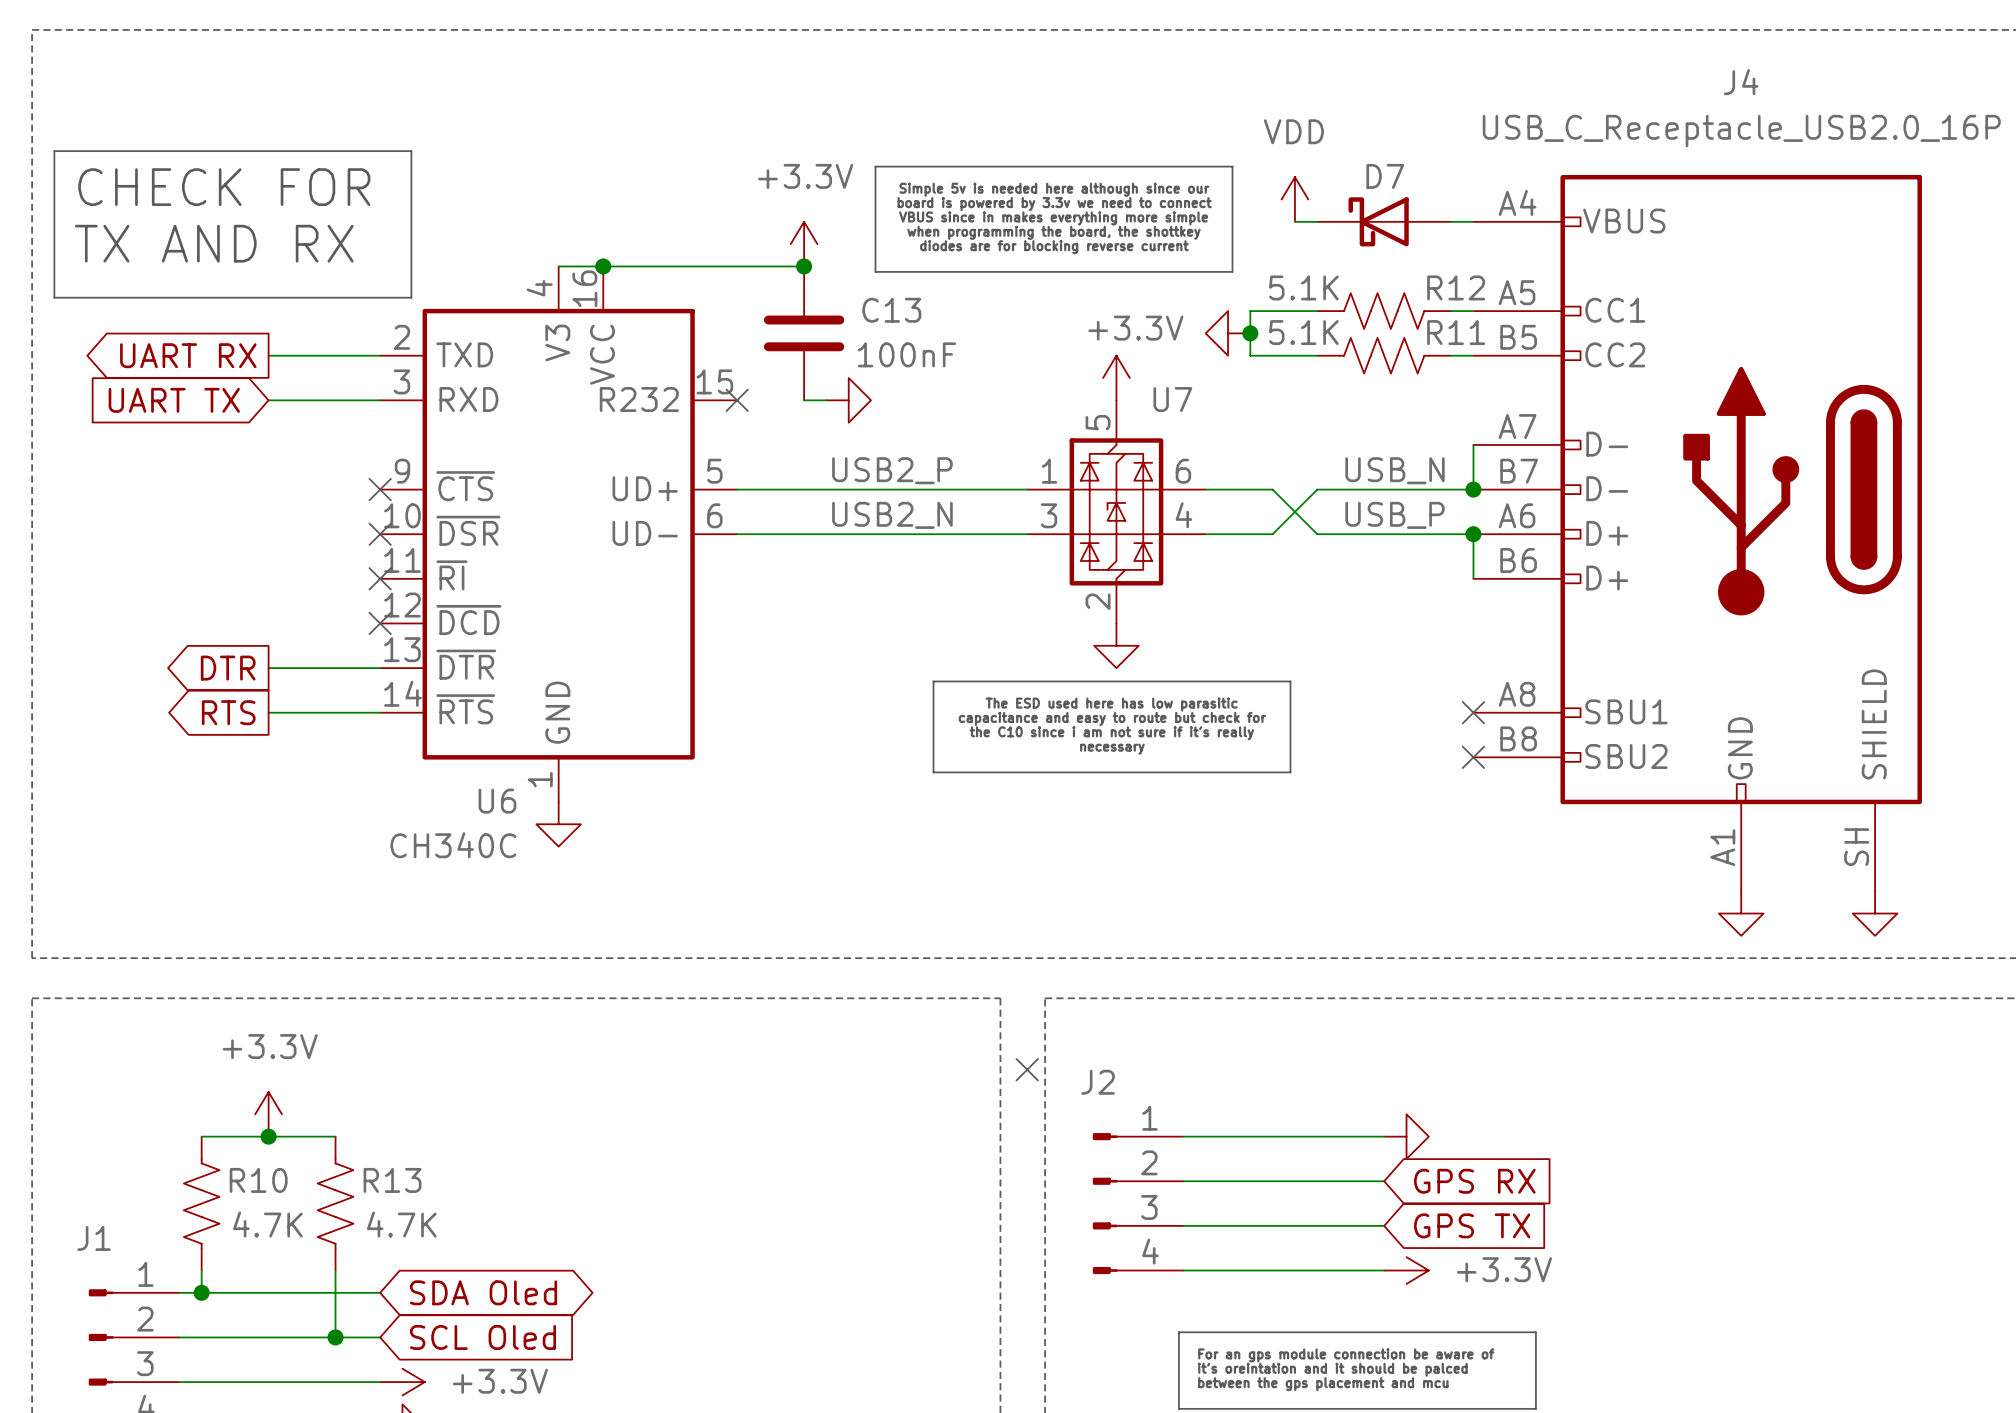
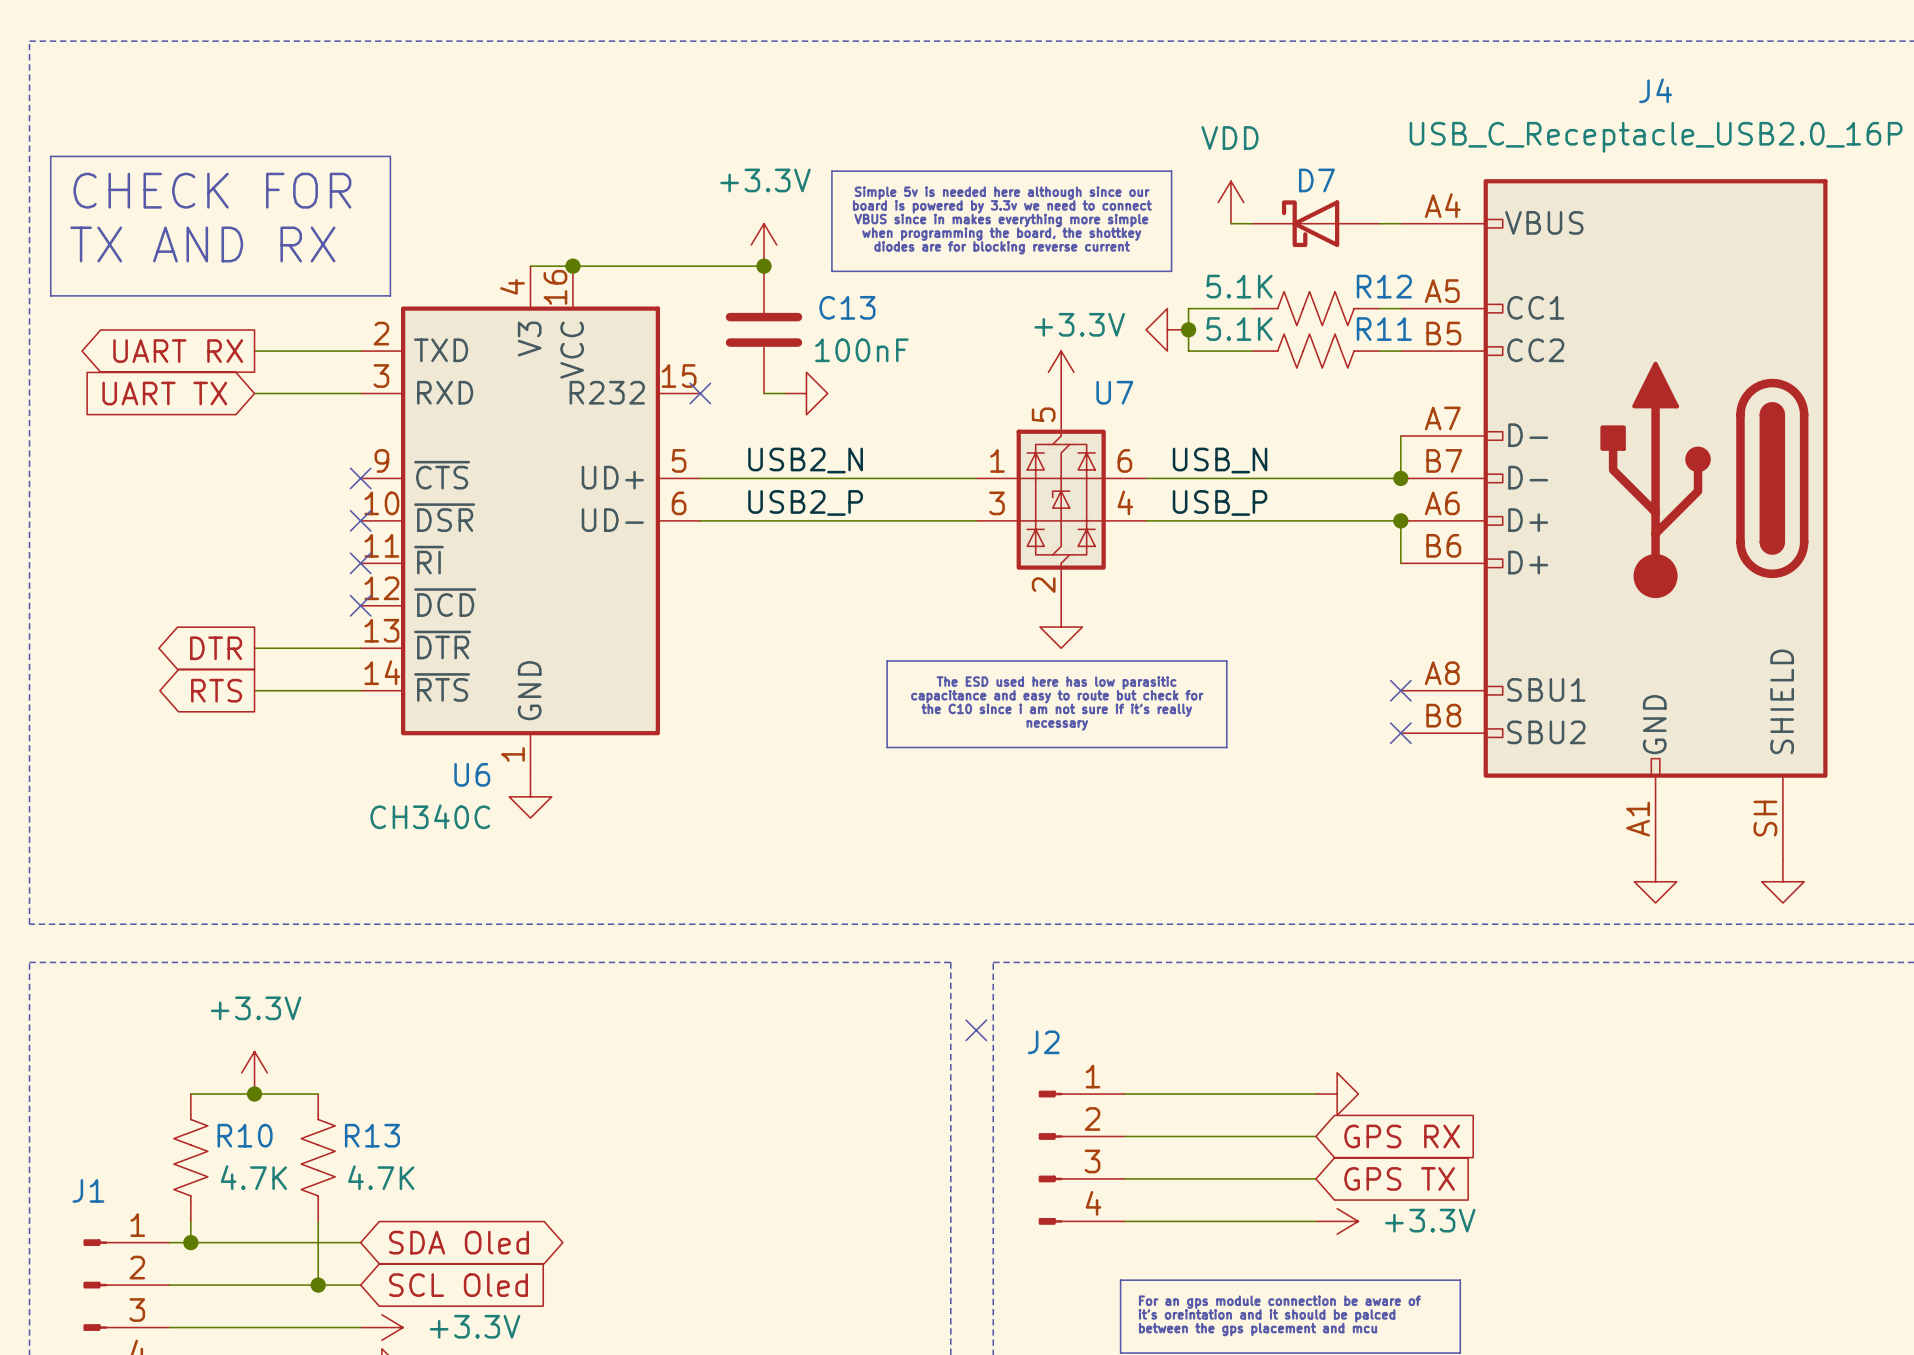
label position: USB2_P (892, 470) -> USB2_P (805, 502)
label position: USB_N (1395, 470) -> USB_N (1220, 460)
wire: (1272, 489) (1317, 534) -> (1209, 478) (1252, 478)
wire: (1317, 489) (1272, 534) -> (1252, 520) (1209, 520)
label position: USB2_N (892, 515) -> USB2_N (805, 460)
label position: USB_P (1395, 515) -> USB_P (1220, 502)

